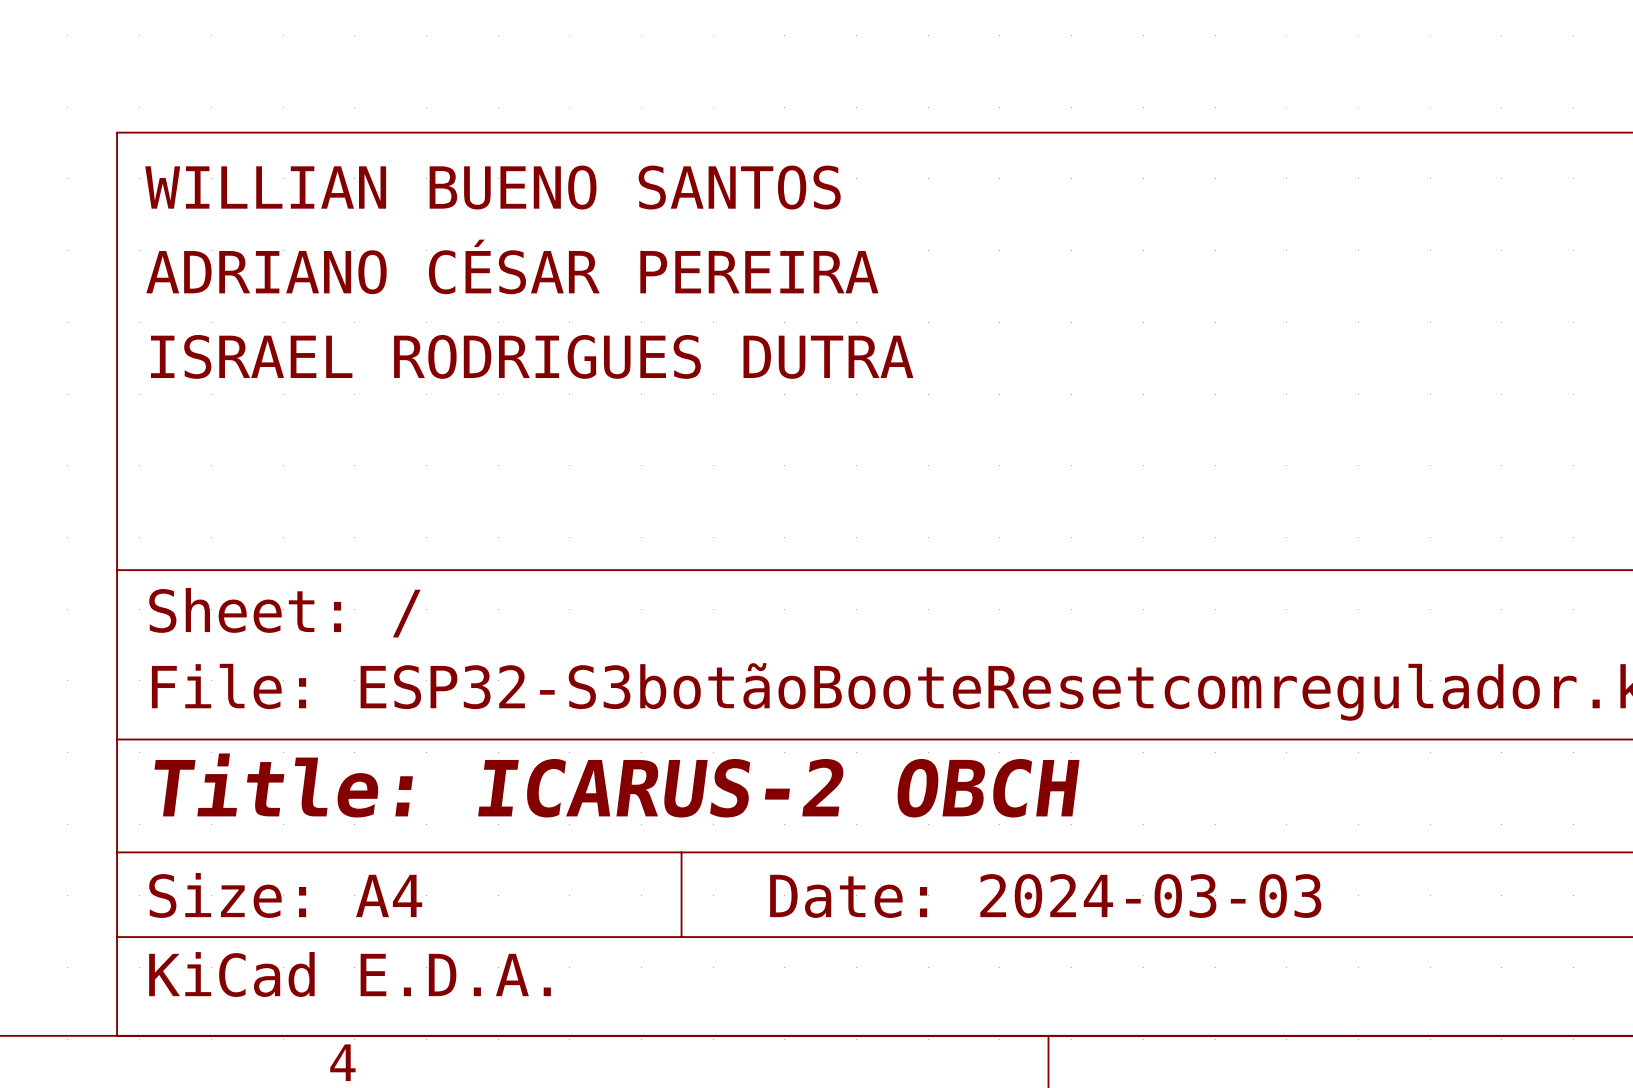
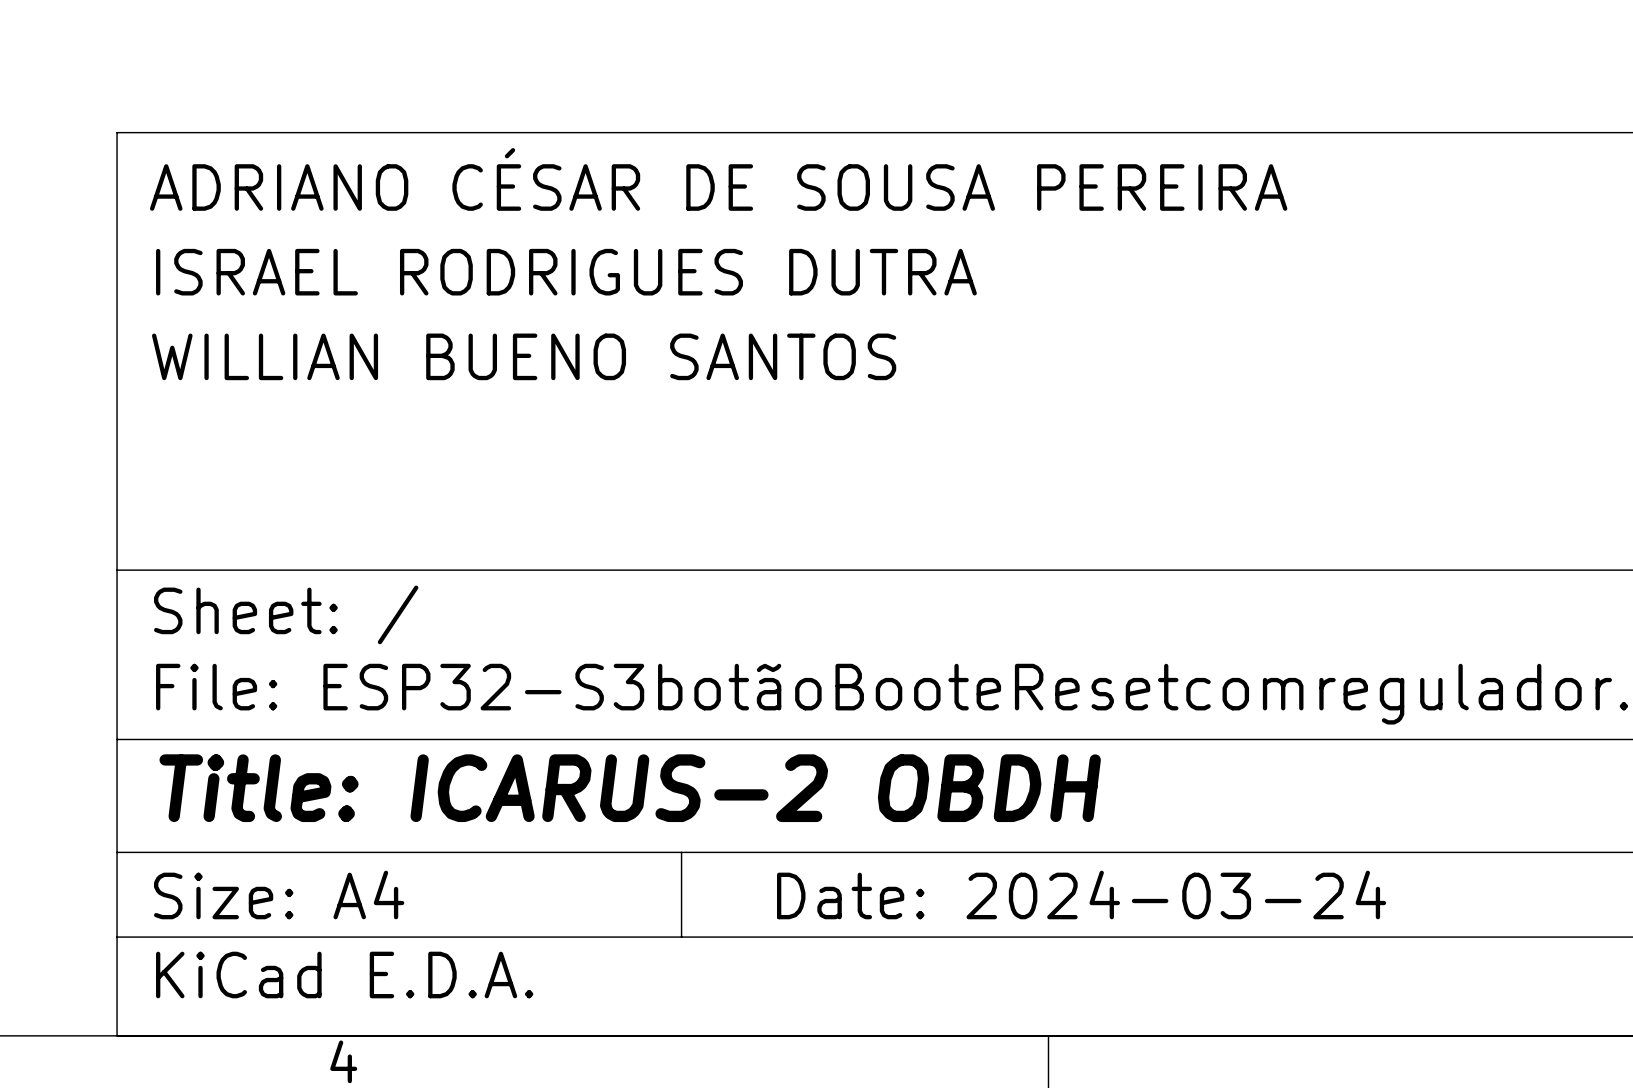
title block: WILLIAN BUENO SANTOS (492, 187) -> ADRIANO CÉSAR DE SOUSA PEREIRA (718, 179)
title block: ADRIANO CÉSAR PEREIRA (512, 266) -> ISRAEL RODRIGUES DUTRA (566, 272)
title block: ISRAEL RODRIGUES DUTRA (532, 356) -> WILLIAN BUENO SANTOS (524, 356)
title block: Title: ICARUS-2 OBCH (616, 785) -> Title: ICARUS-2 OBDH (630, 788)
title block: Date: 2024-03-03 (1045, 896) -> Date: 2024-03-24 (1081, 894)

